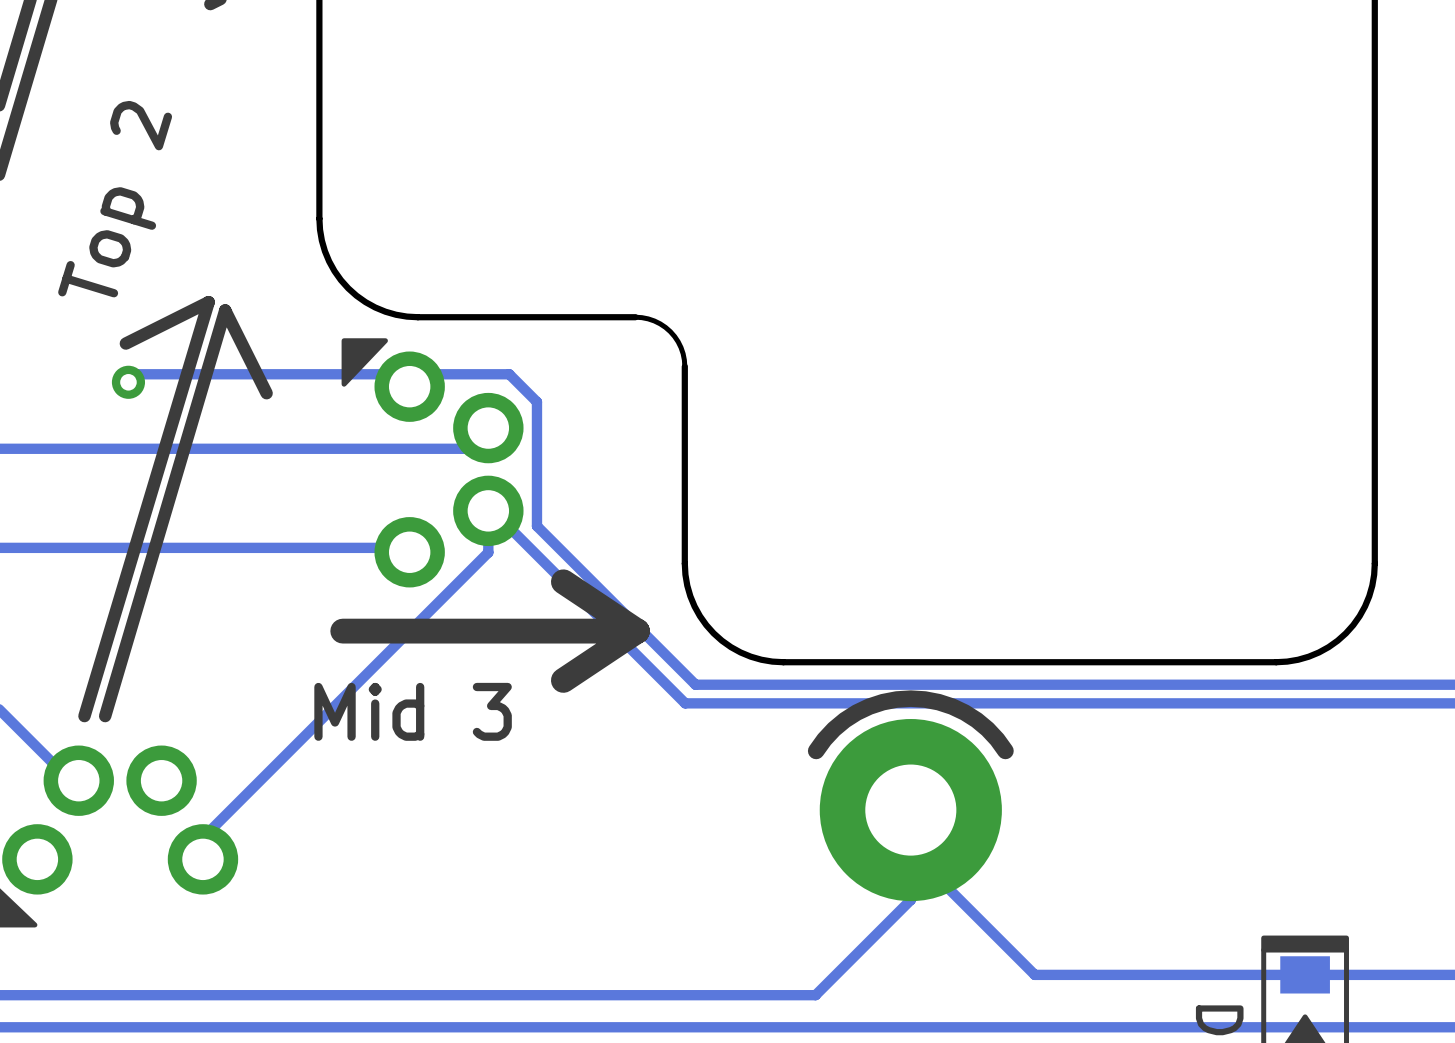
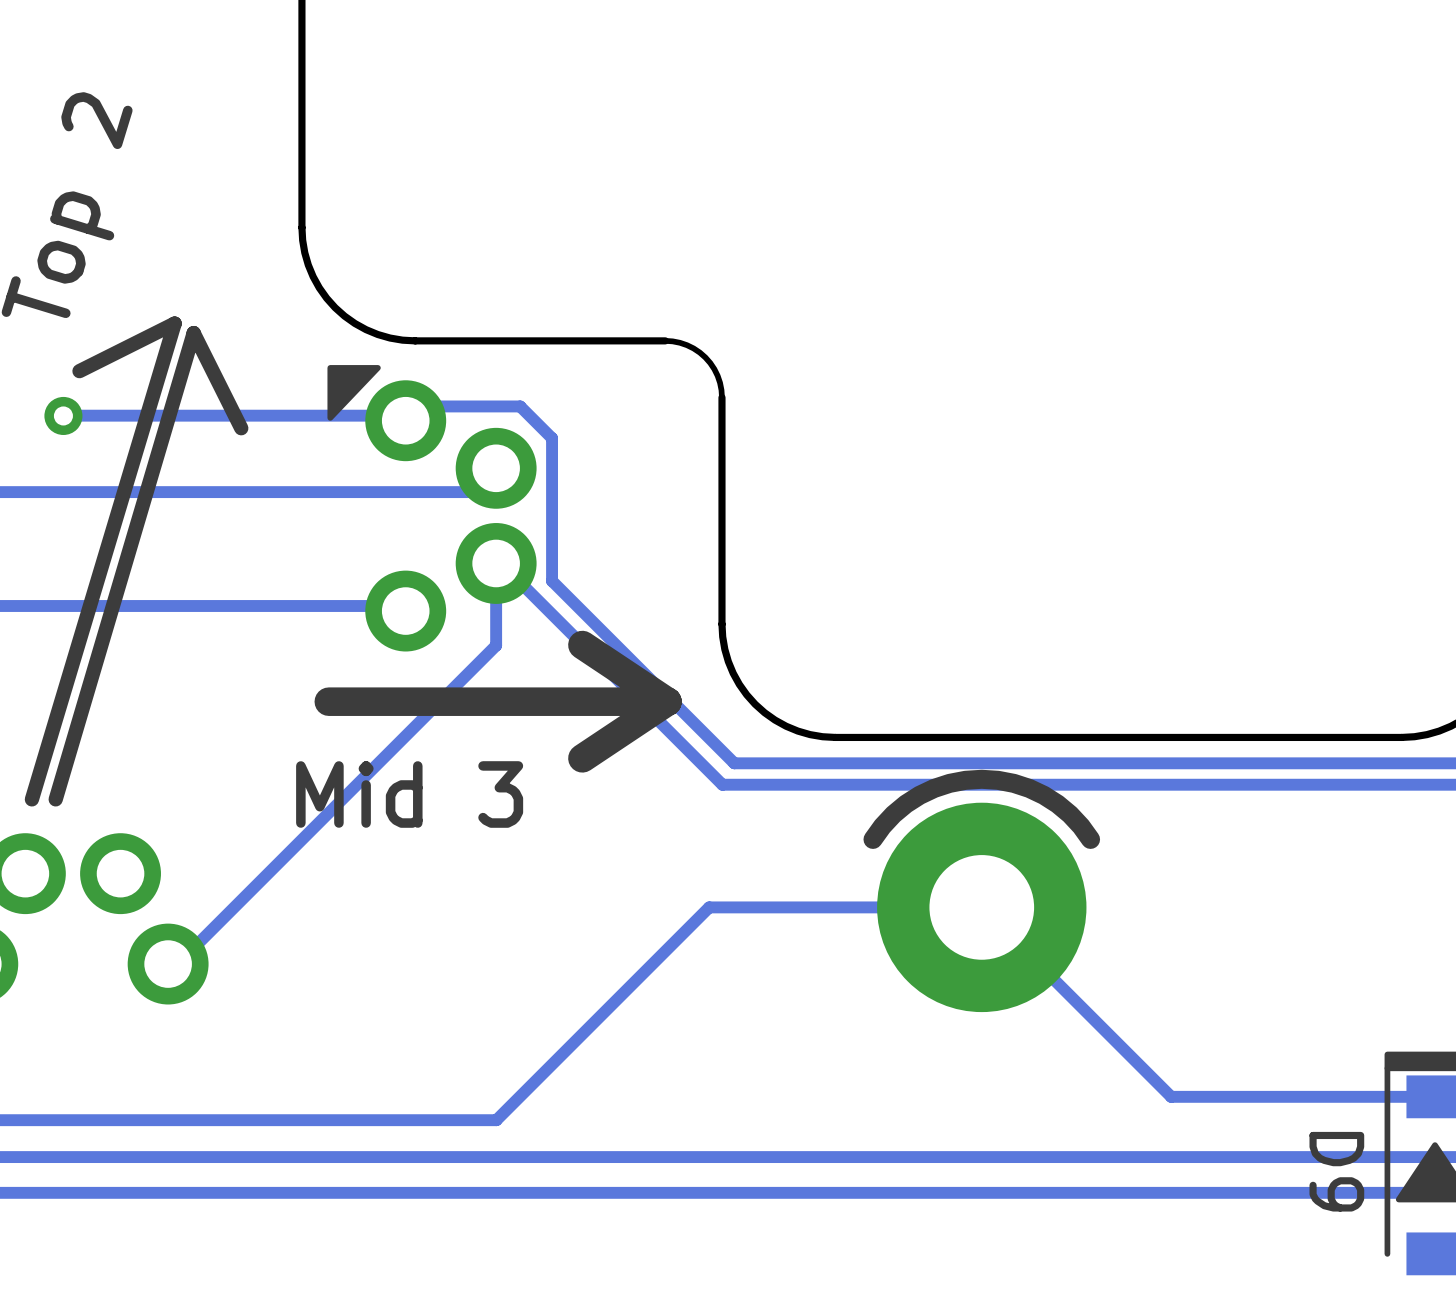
track: (417, 374) (136, 374) (128, 382) -> (414, 406) (405, 415) (63, 415)
via position: (128, 382) -> (63, 415)
track: (488, 552) (202, 837) (202, 867) -> (496, 611) (496, 645) (168, 973)
track: (910, 810) (910, 899) (815, 995) (488, 995) -> (1171, 1096) (981, 907) (709, 907) (496, 1120)
track: (910, 850) (1034, 974) (1075, 974) -> none

